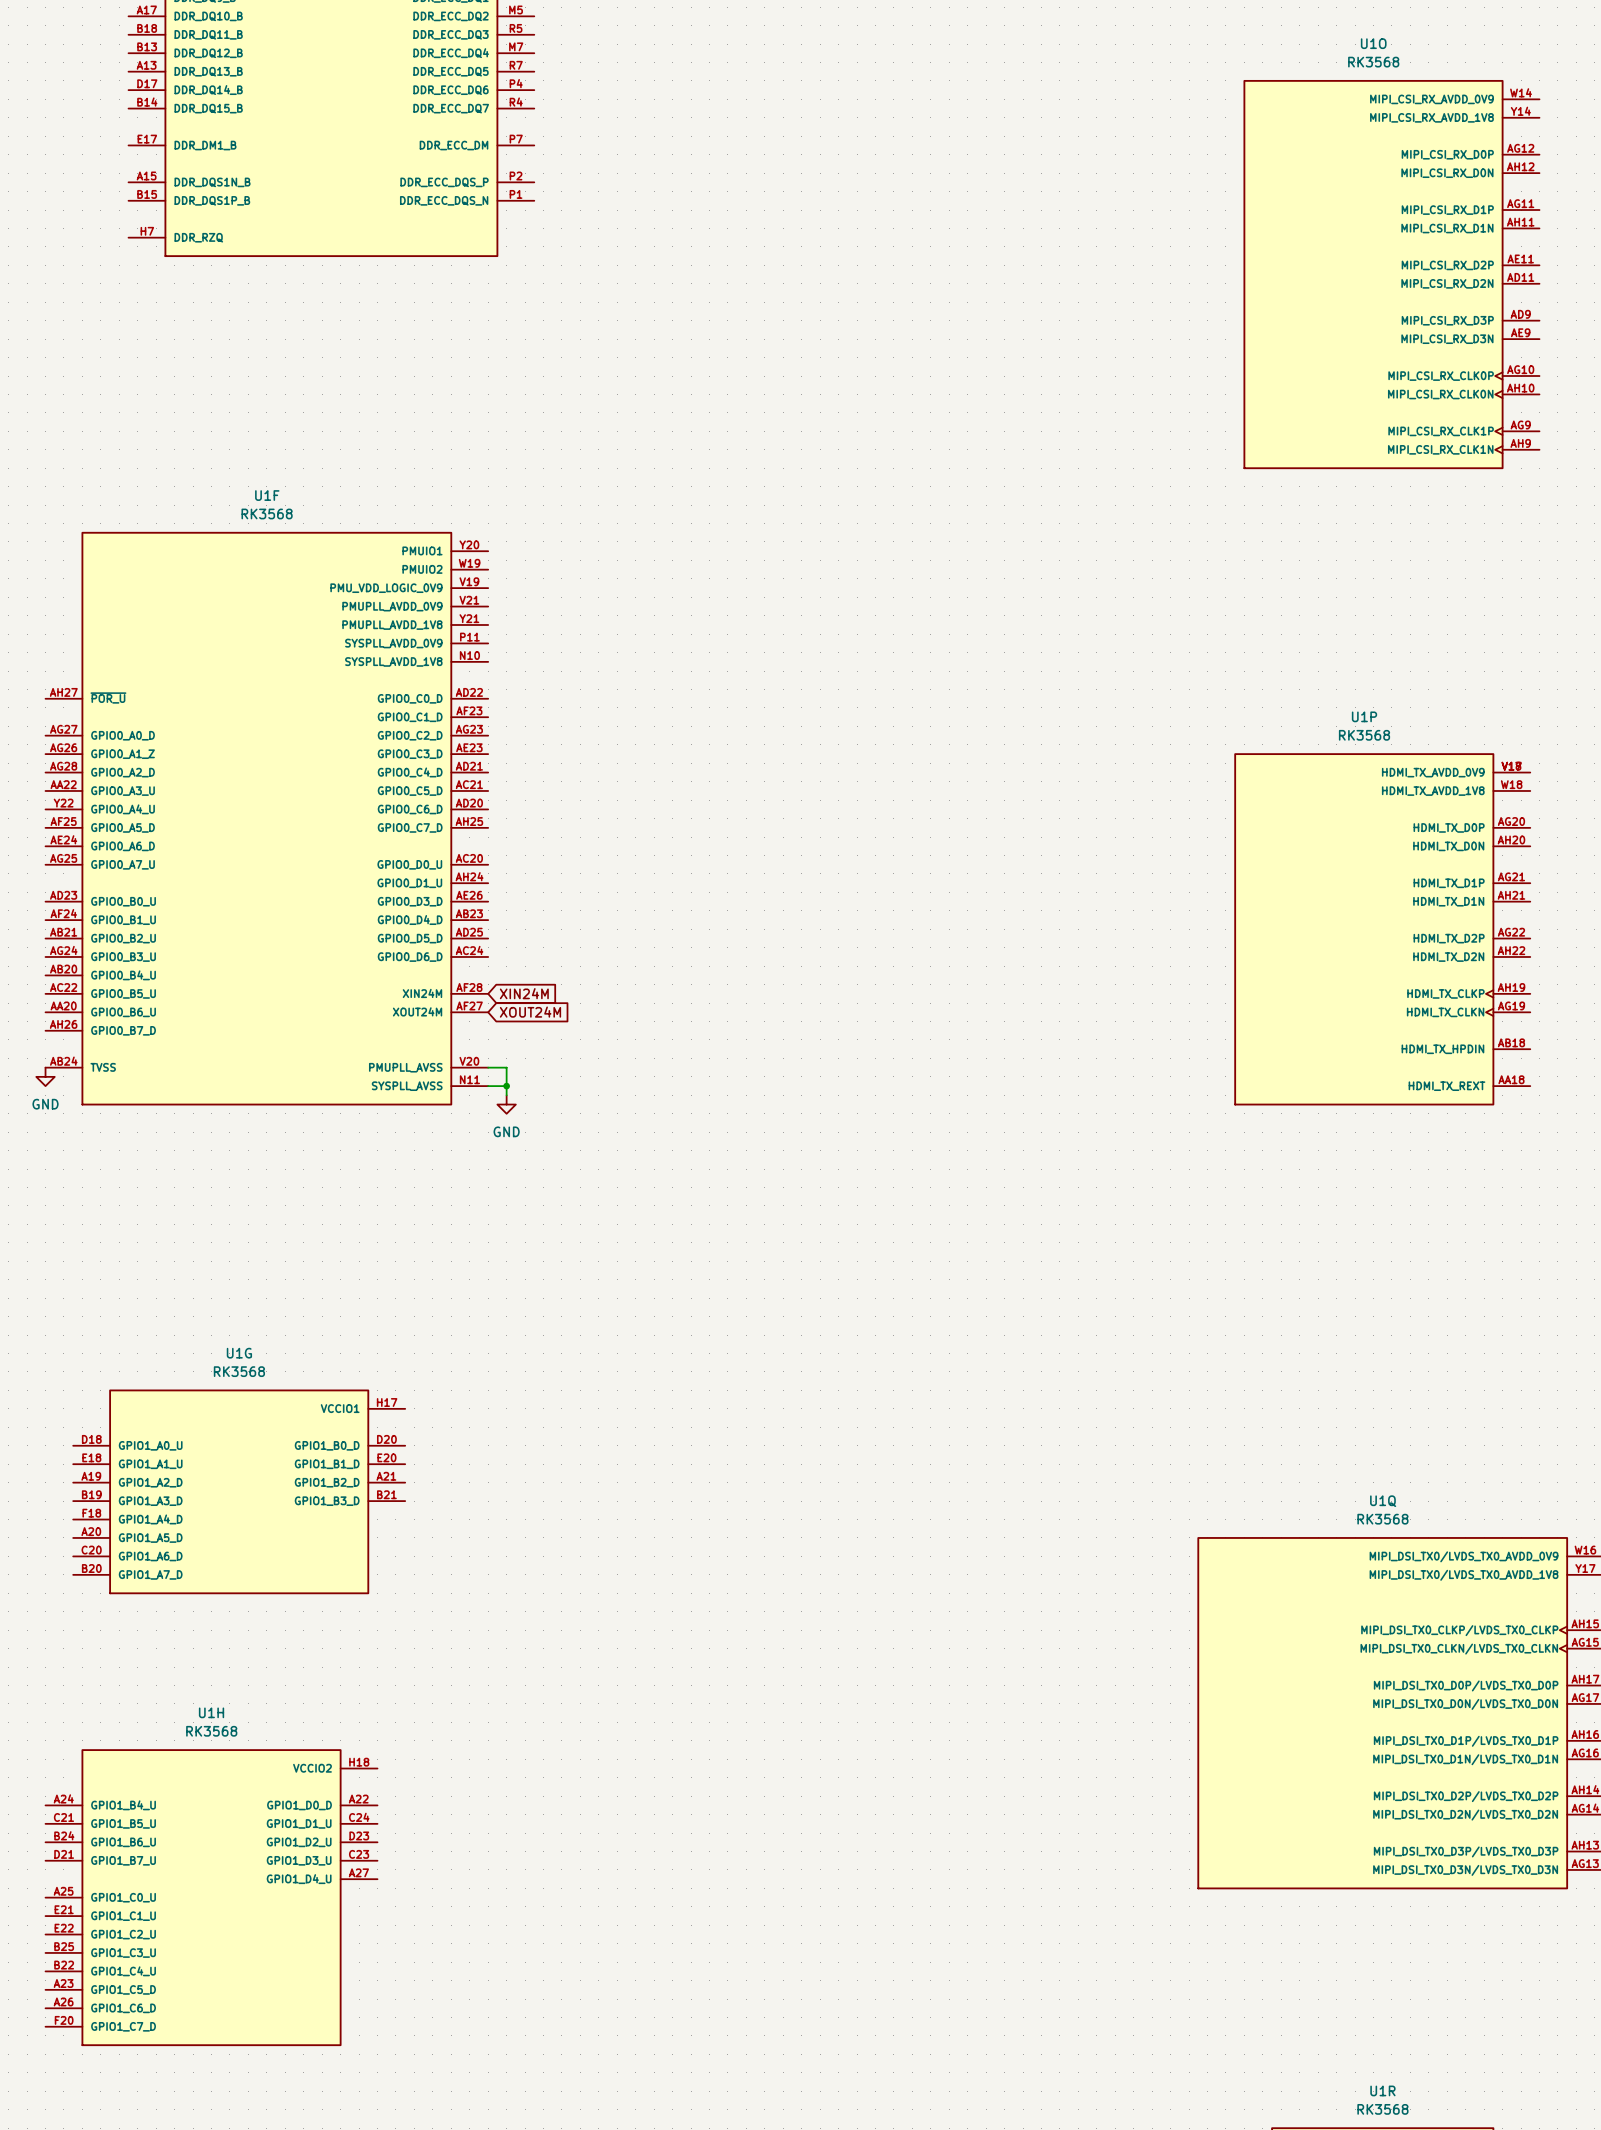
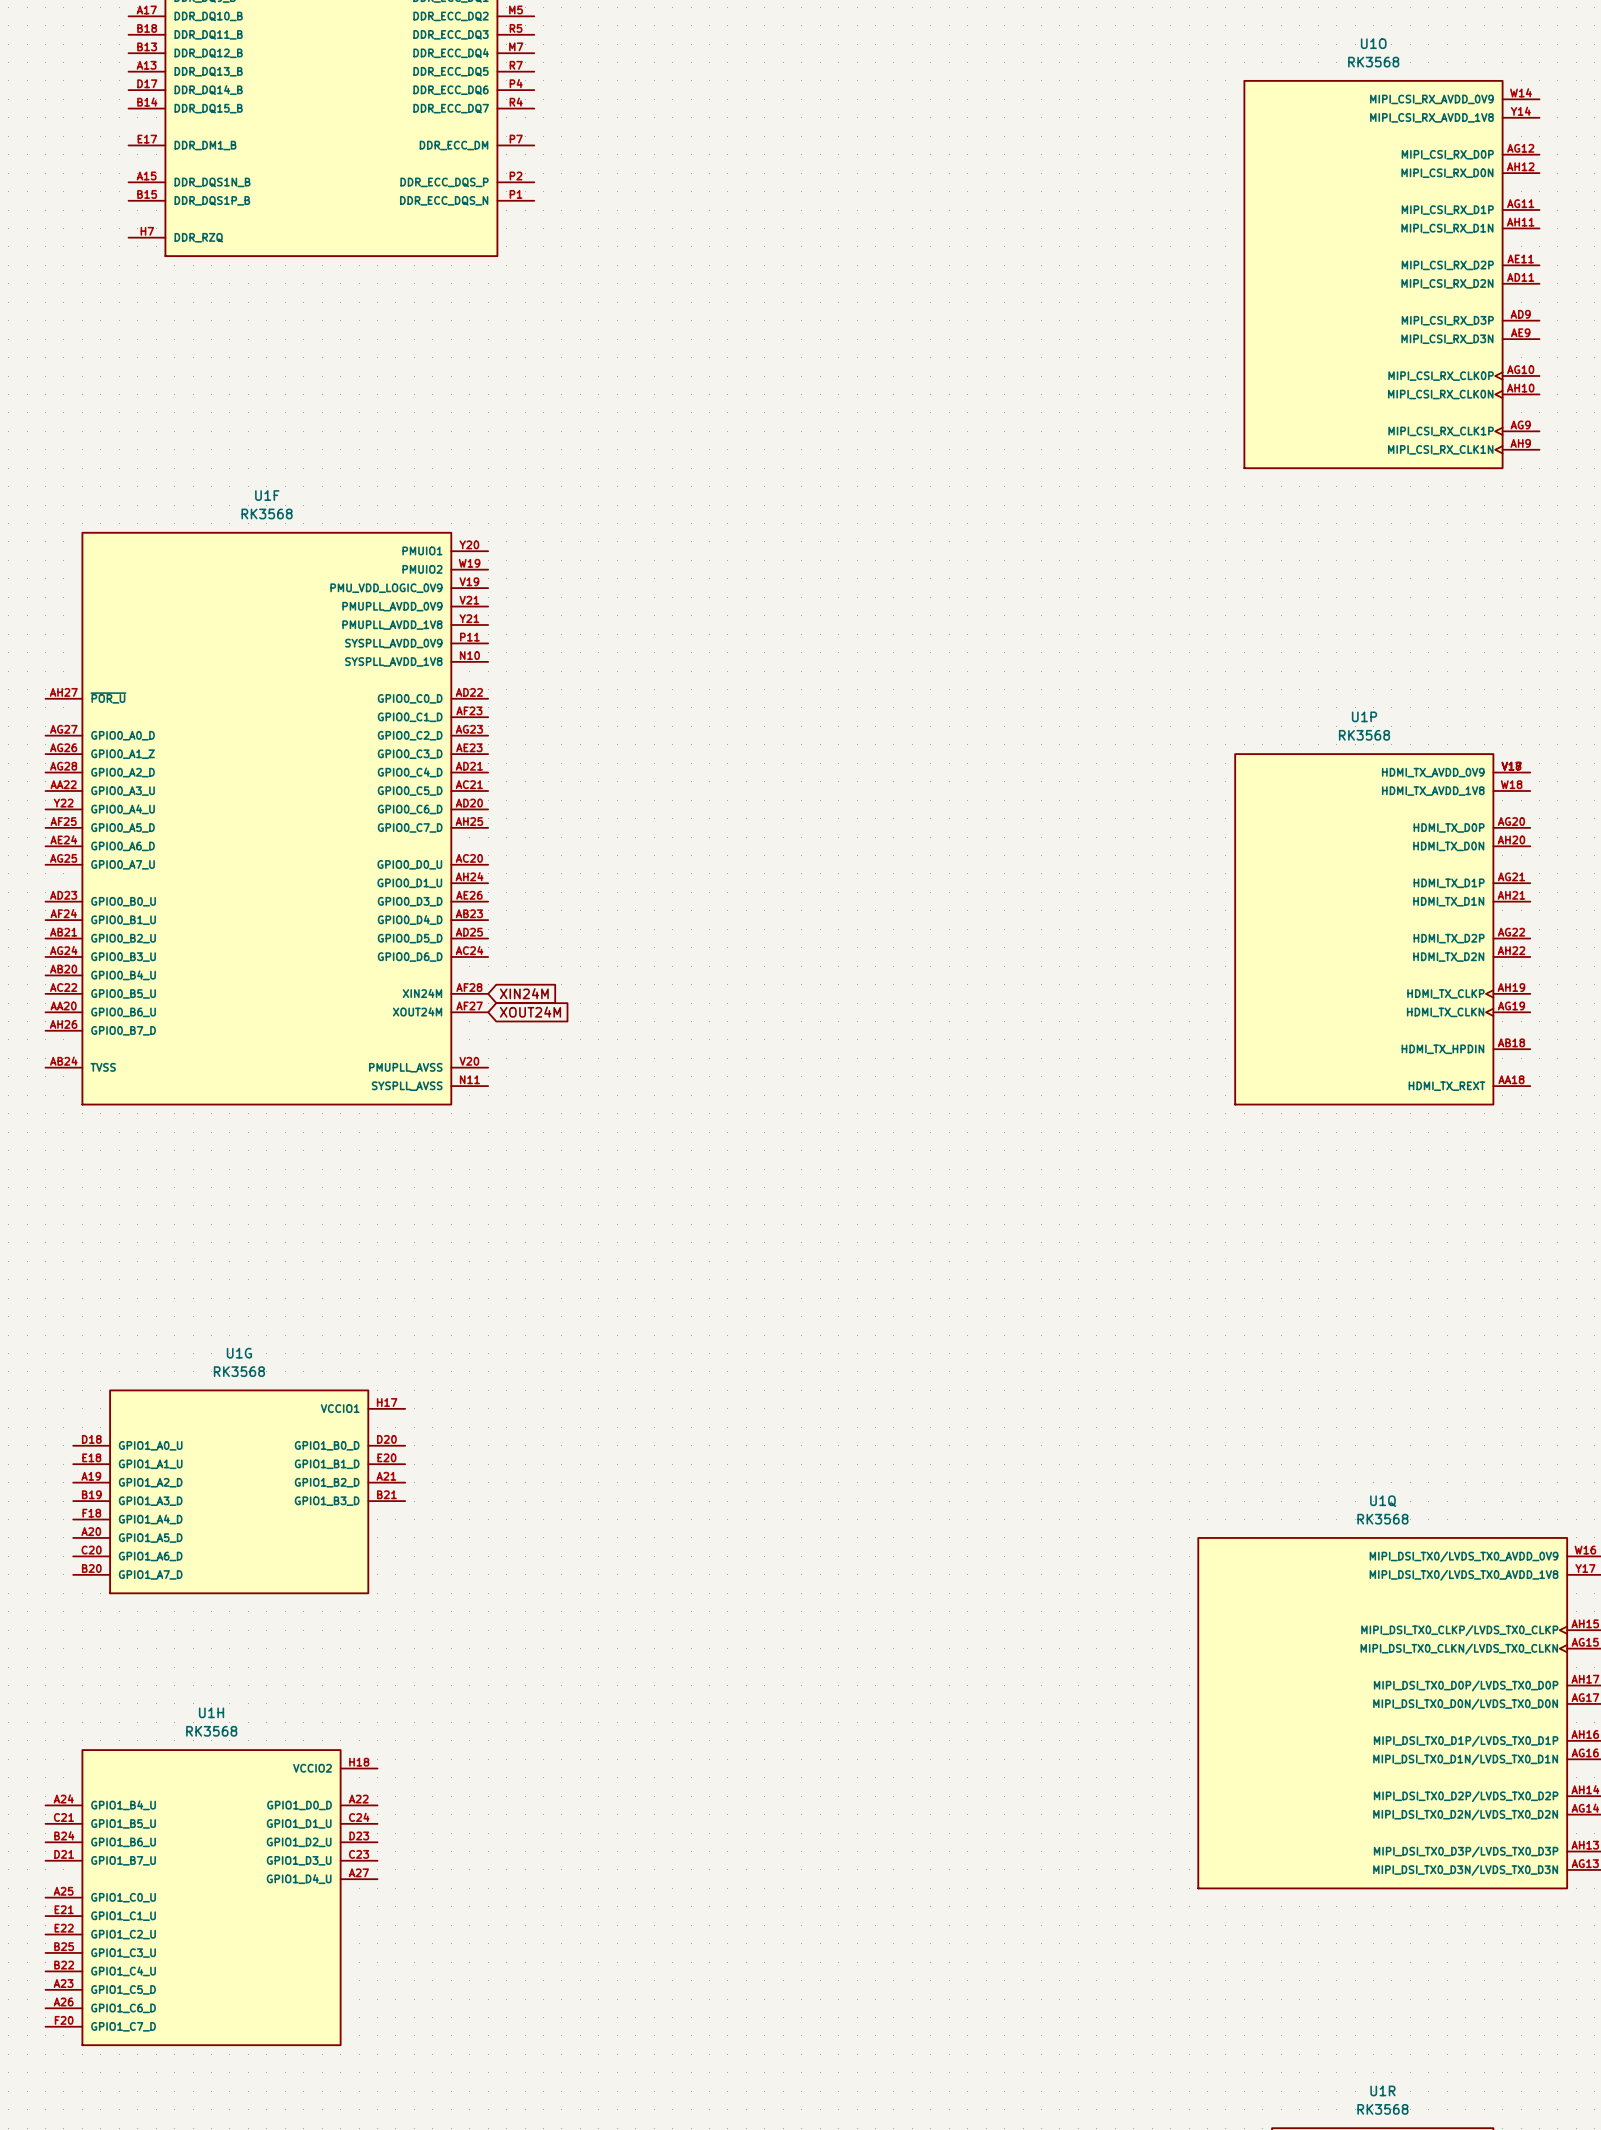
wire: (488, 1067) (506, 1067) (506, 1095) -> none
power symbol: GND (45, 1076) -> none
wire: (488, 1086) (506, 1086) -> none
junction: (506, 1086) -> none
power symbol: GND (506, 1104) -> none

